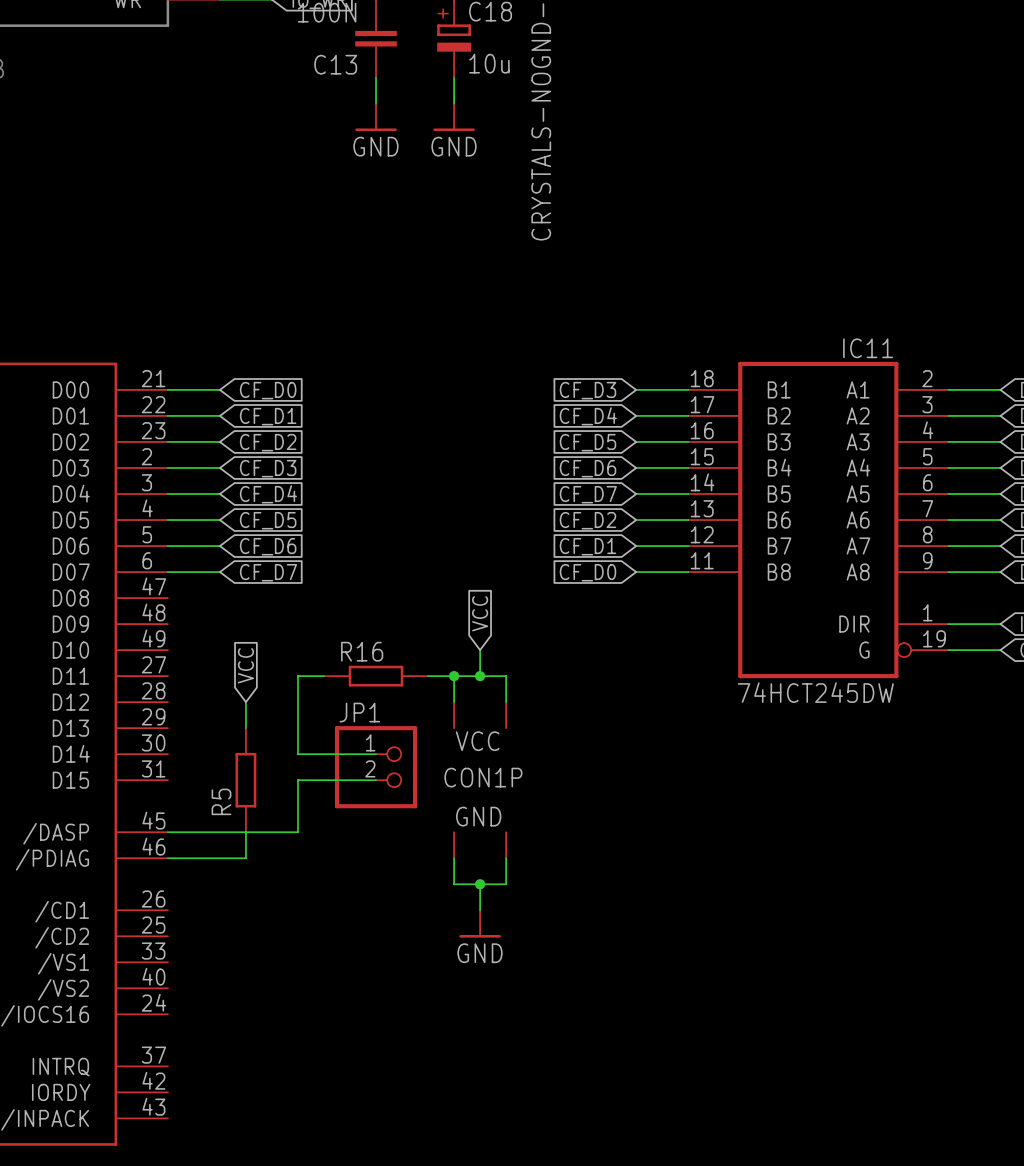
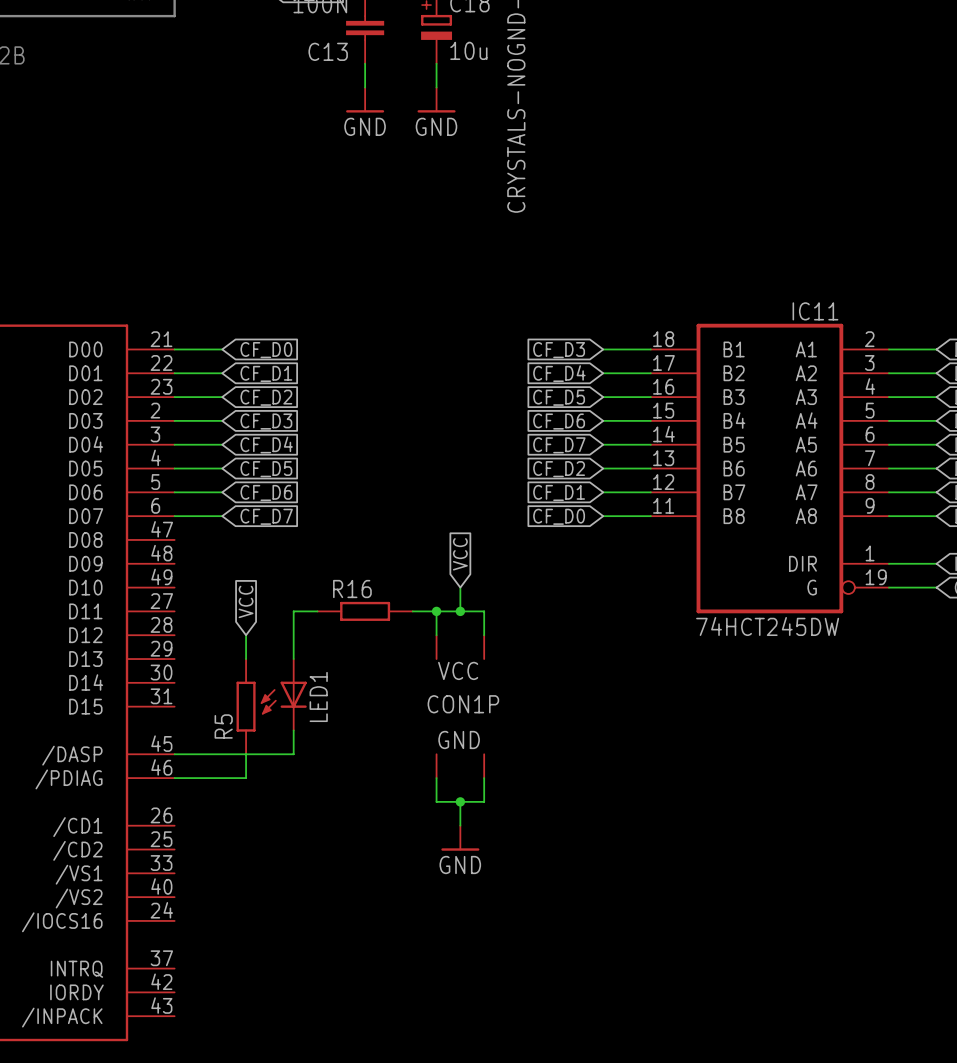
wire: (297, 728) (297, 754) (376, 754) -> none
LED1: none -> (283, 694)
JP1: (376, 767) -> none
wire: (376, 780) (297, 780) (297, 806) -> none

